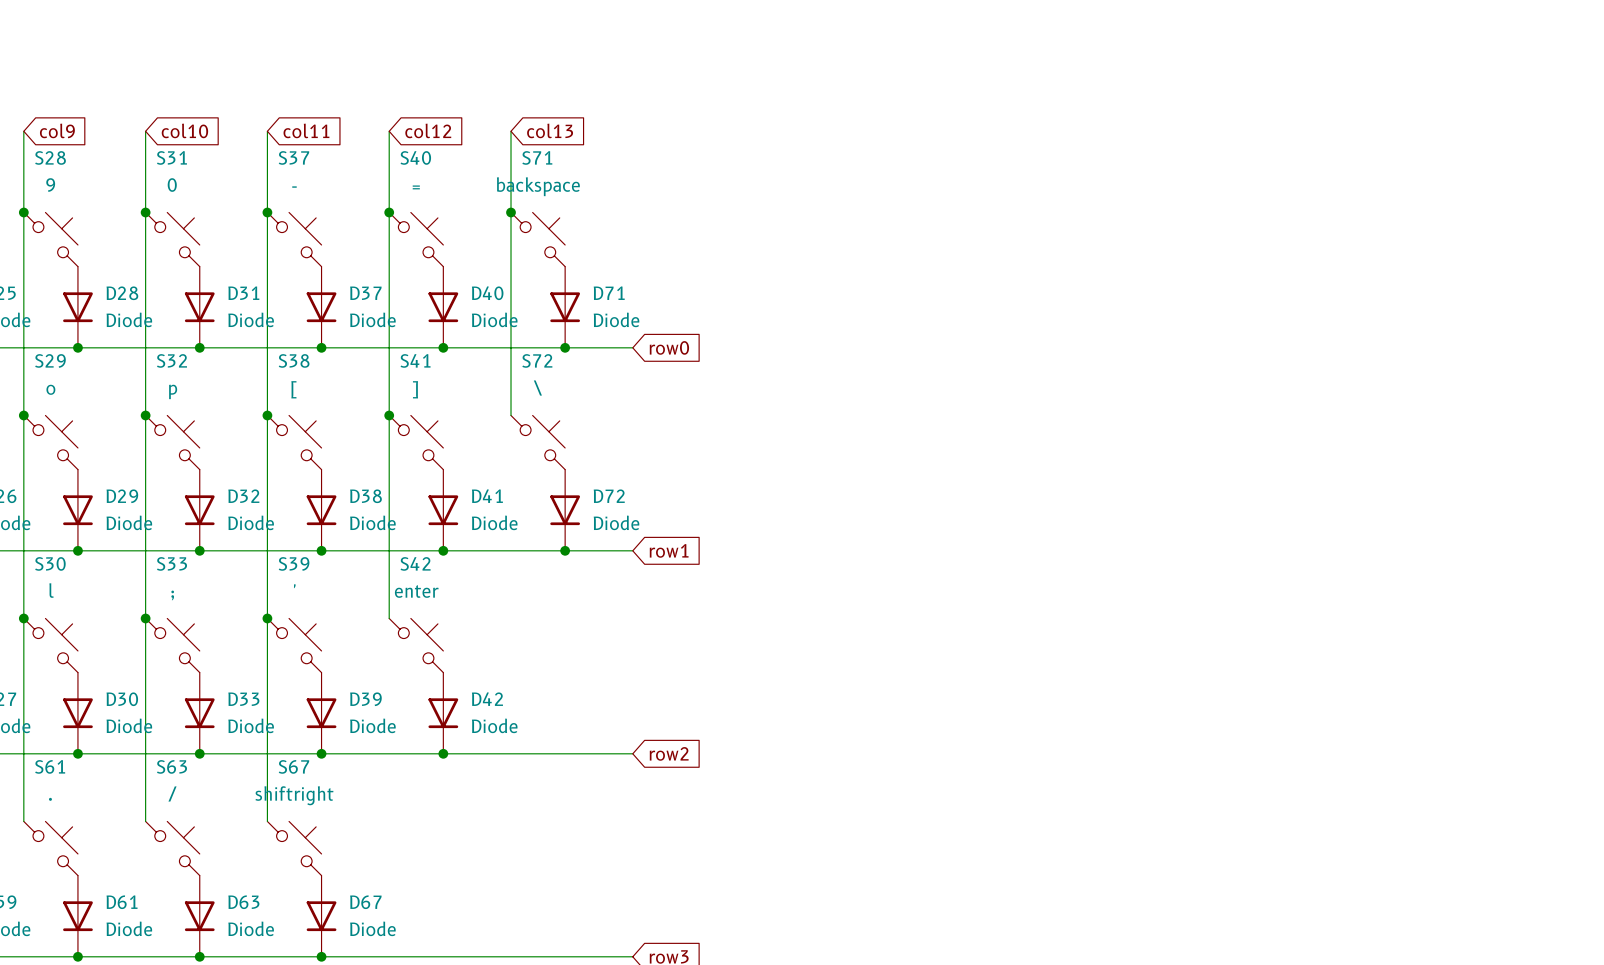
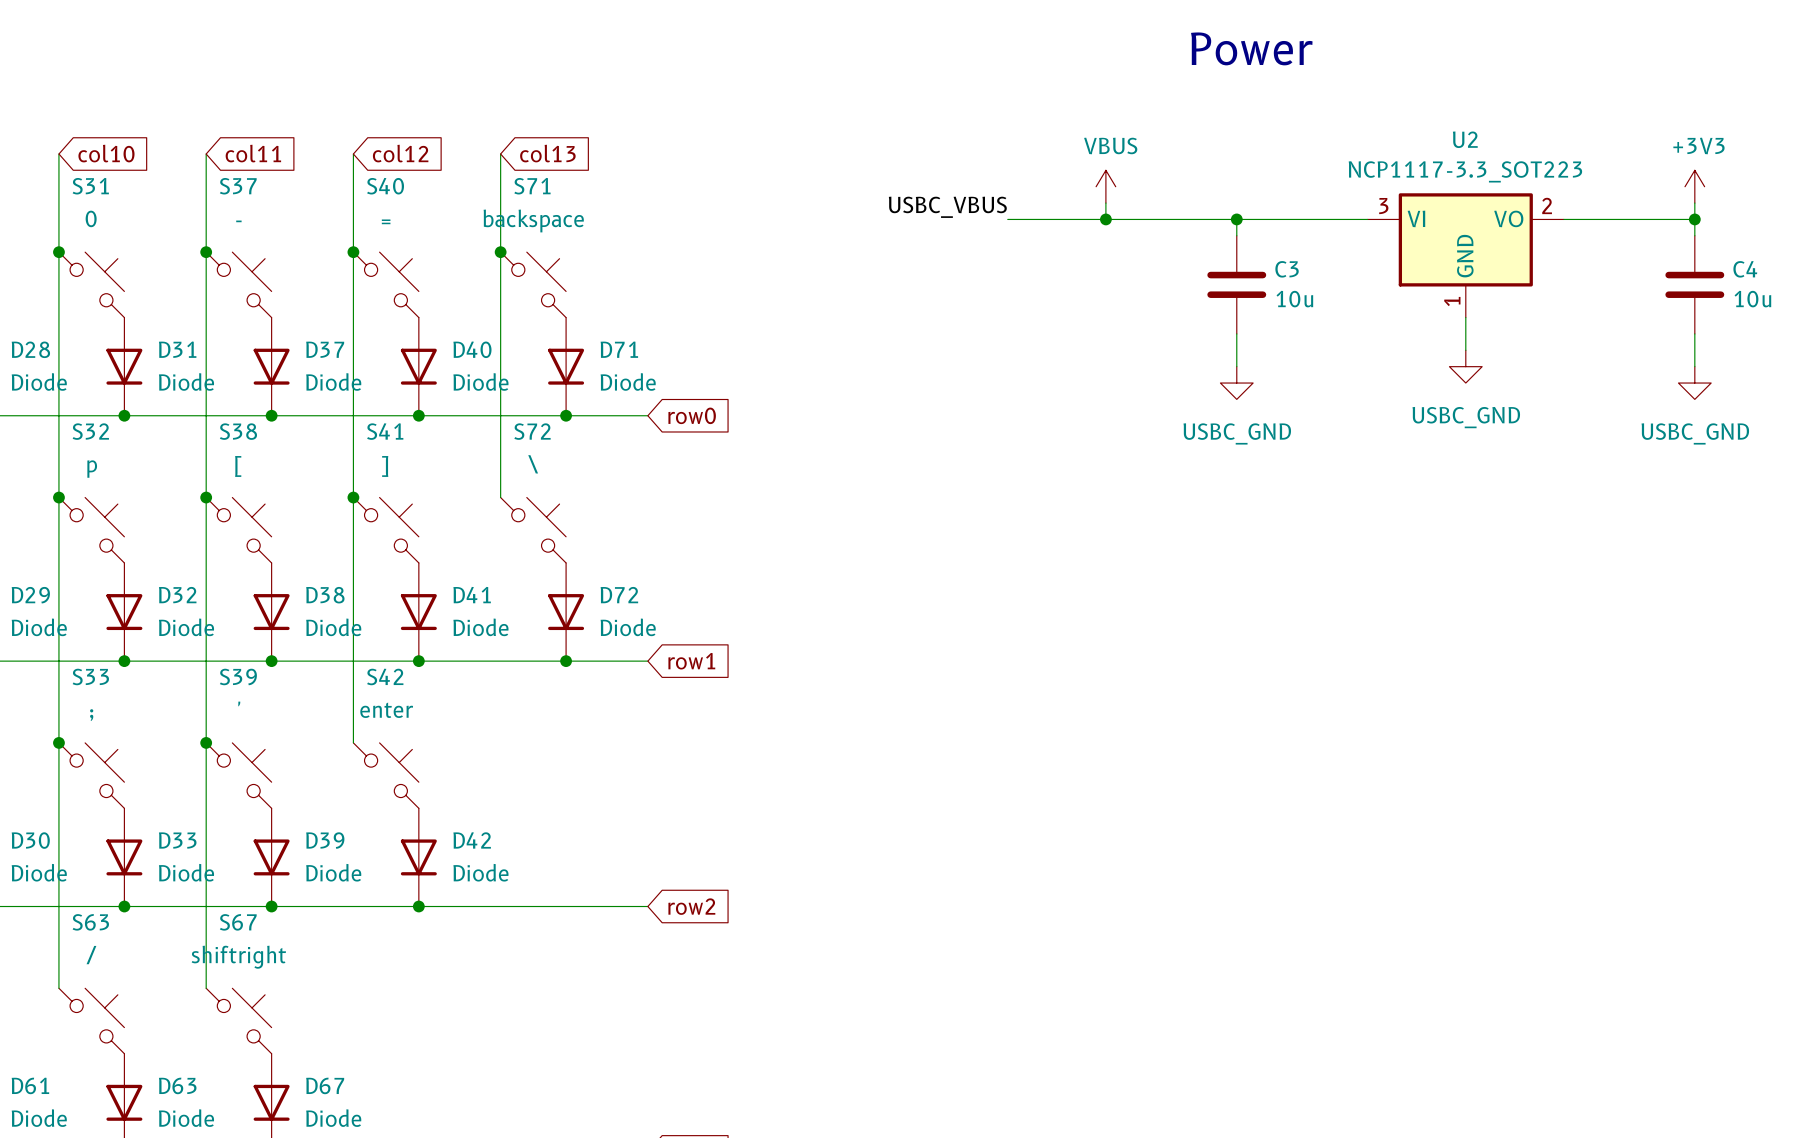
text: none -> Power (1251, 48)
power symbol: none -> VBUS (1105, 186)
power symbol: none -> +3V3 (1694, 186)
wire: none -> (1105, 203) (1105, 219)
wire: none -> (1694, 203) (1694, 235)
label: none -> USBC_VBUS (947, 207)
wire: none -> (1007, 219) (1367, 219)
junction: none -> (1105, 219)
wire: none -> (1236, 219) (1236, 235)
junction: none -> (1236, 219)
wire: none -> (1563, 219) (1694, 219)
junction: none -> (1694, 219)
U2: none -> NCP1117-3.3_SOT223 (1465, 255)
C3: none -> 10u (1236, 284)
C4: none -> 10u (1694, 284)
wire: none -> (1465, 317) (1465, 350)
wire: none -> (1236, 333) (1236, 366)
wire: none -> (1694, 333) (1694, 366)
power symbol: none -> USBC_GND (1465, 366)
power symbol: none -> USBC_GND (1236, 383)
power symbol: none -> USBC_GND (1694, 383)

